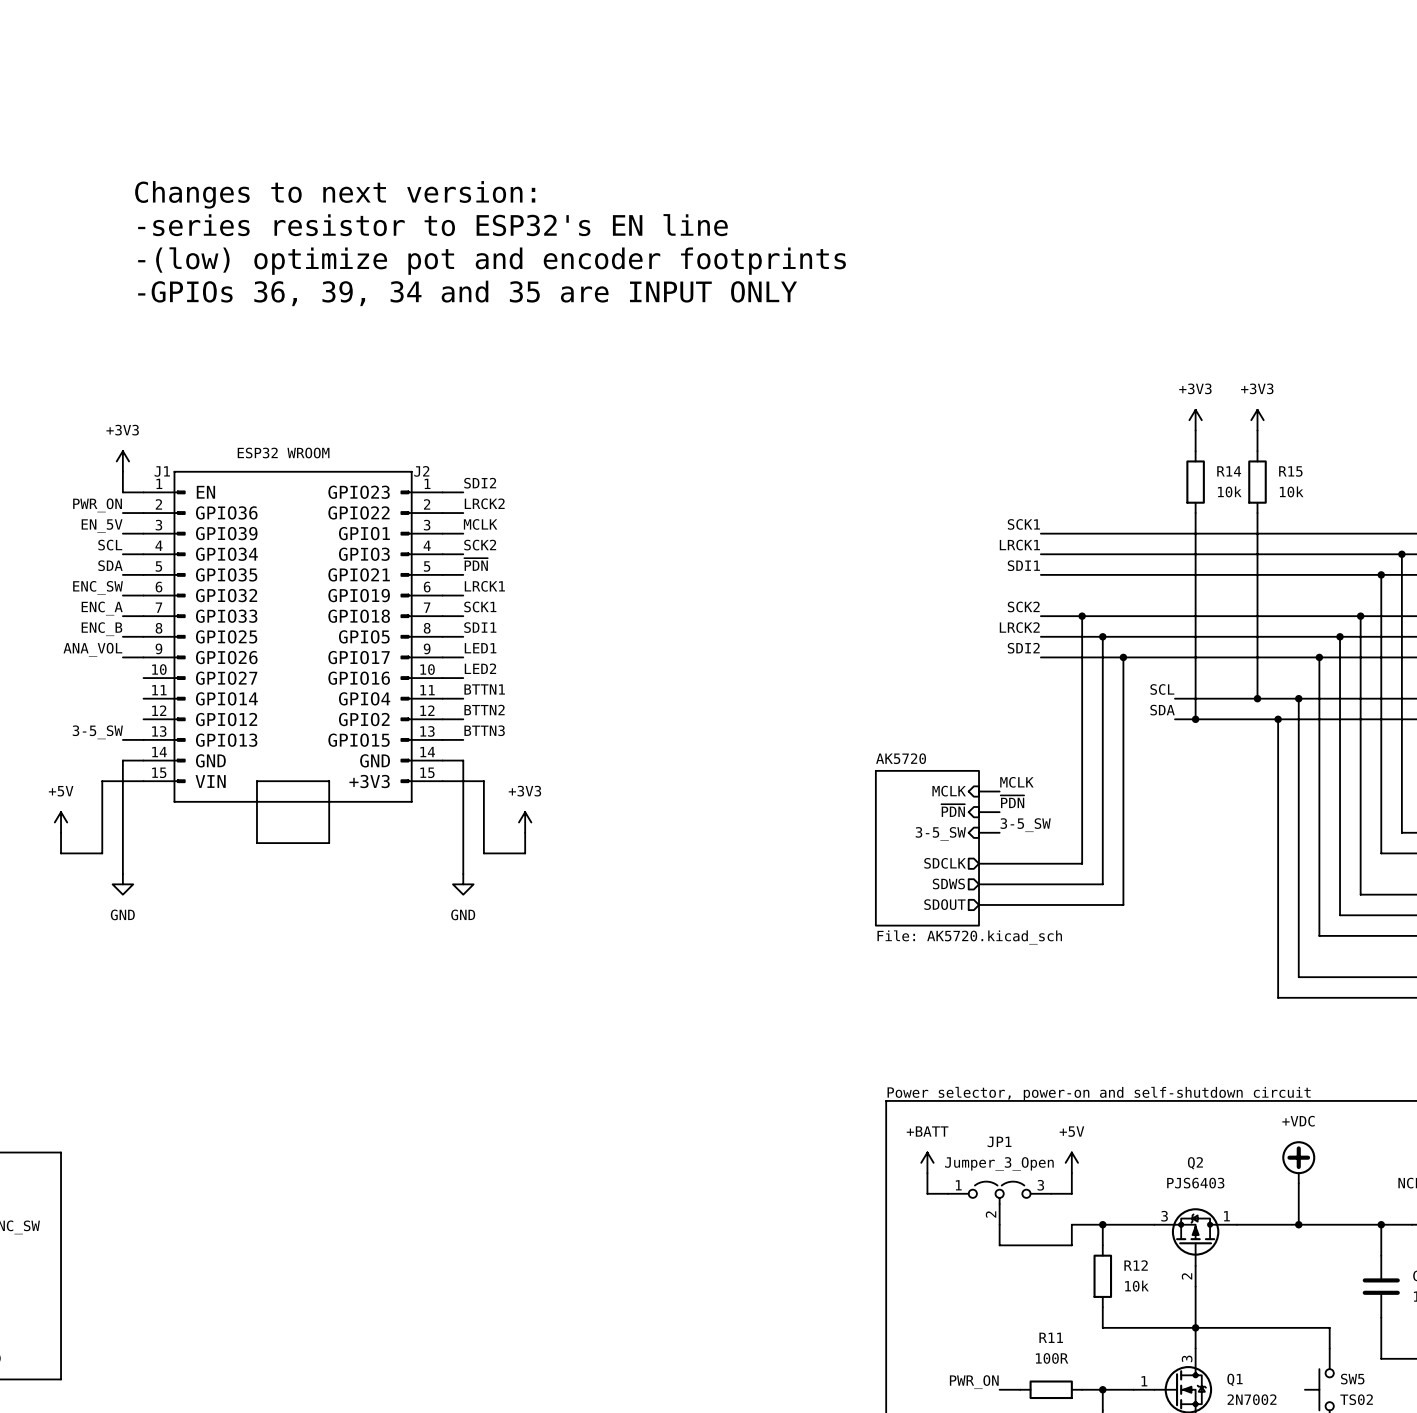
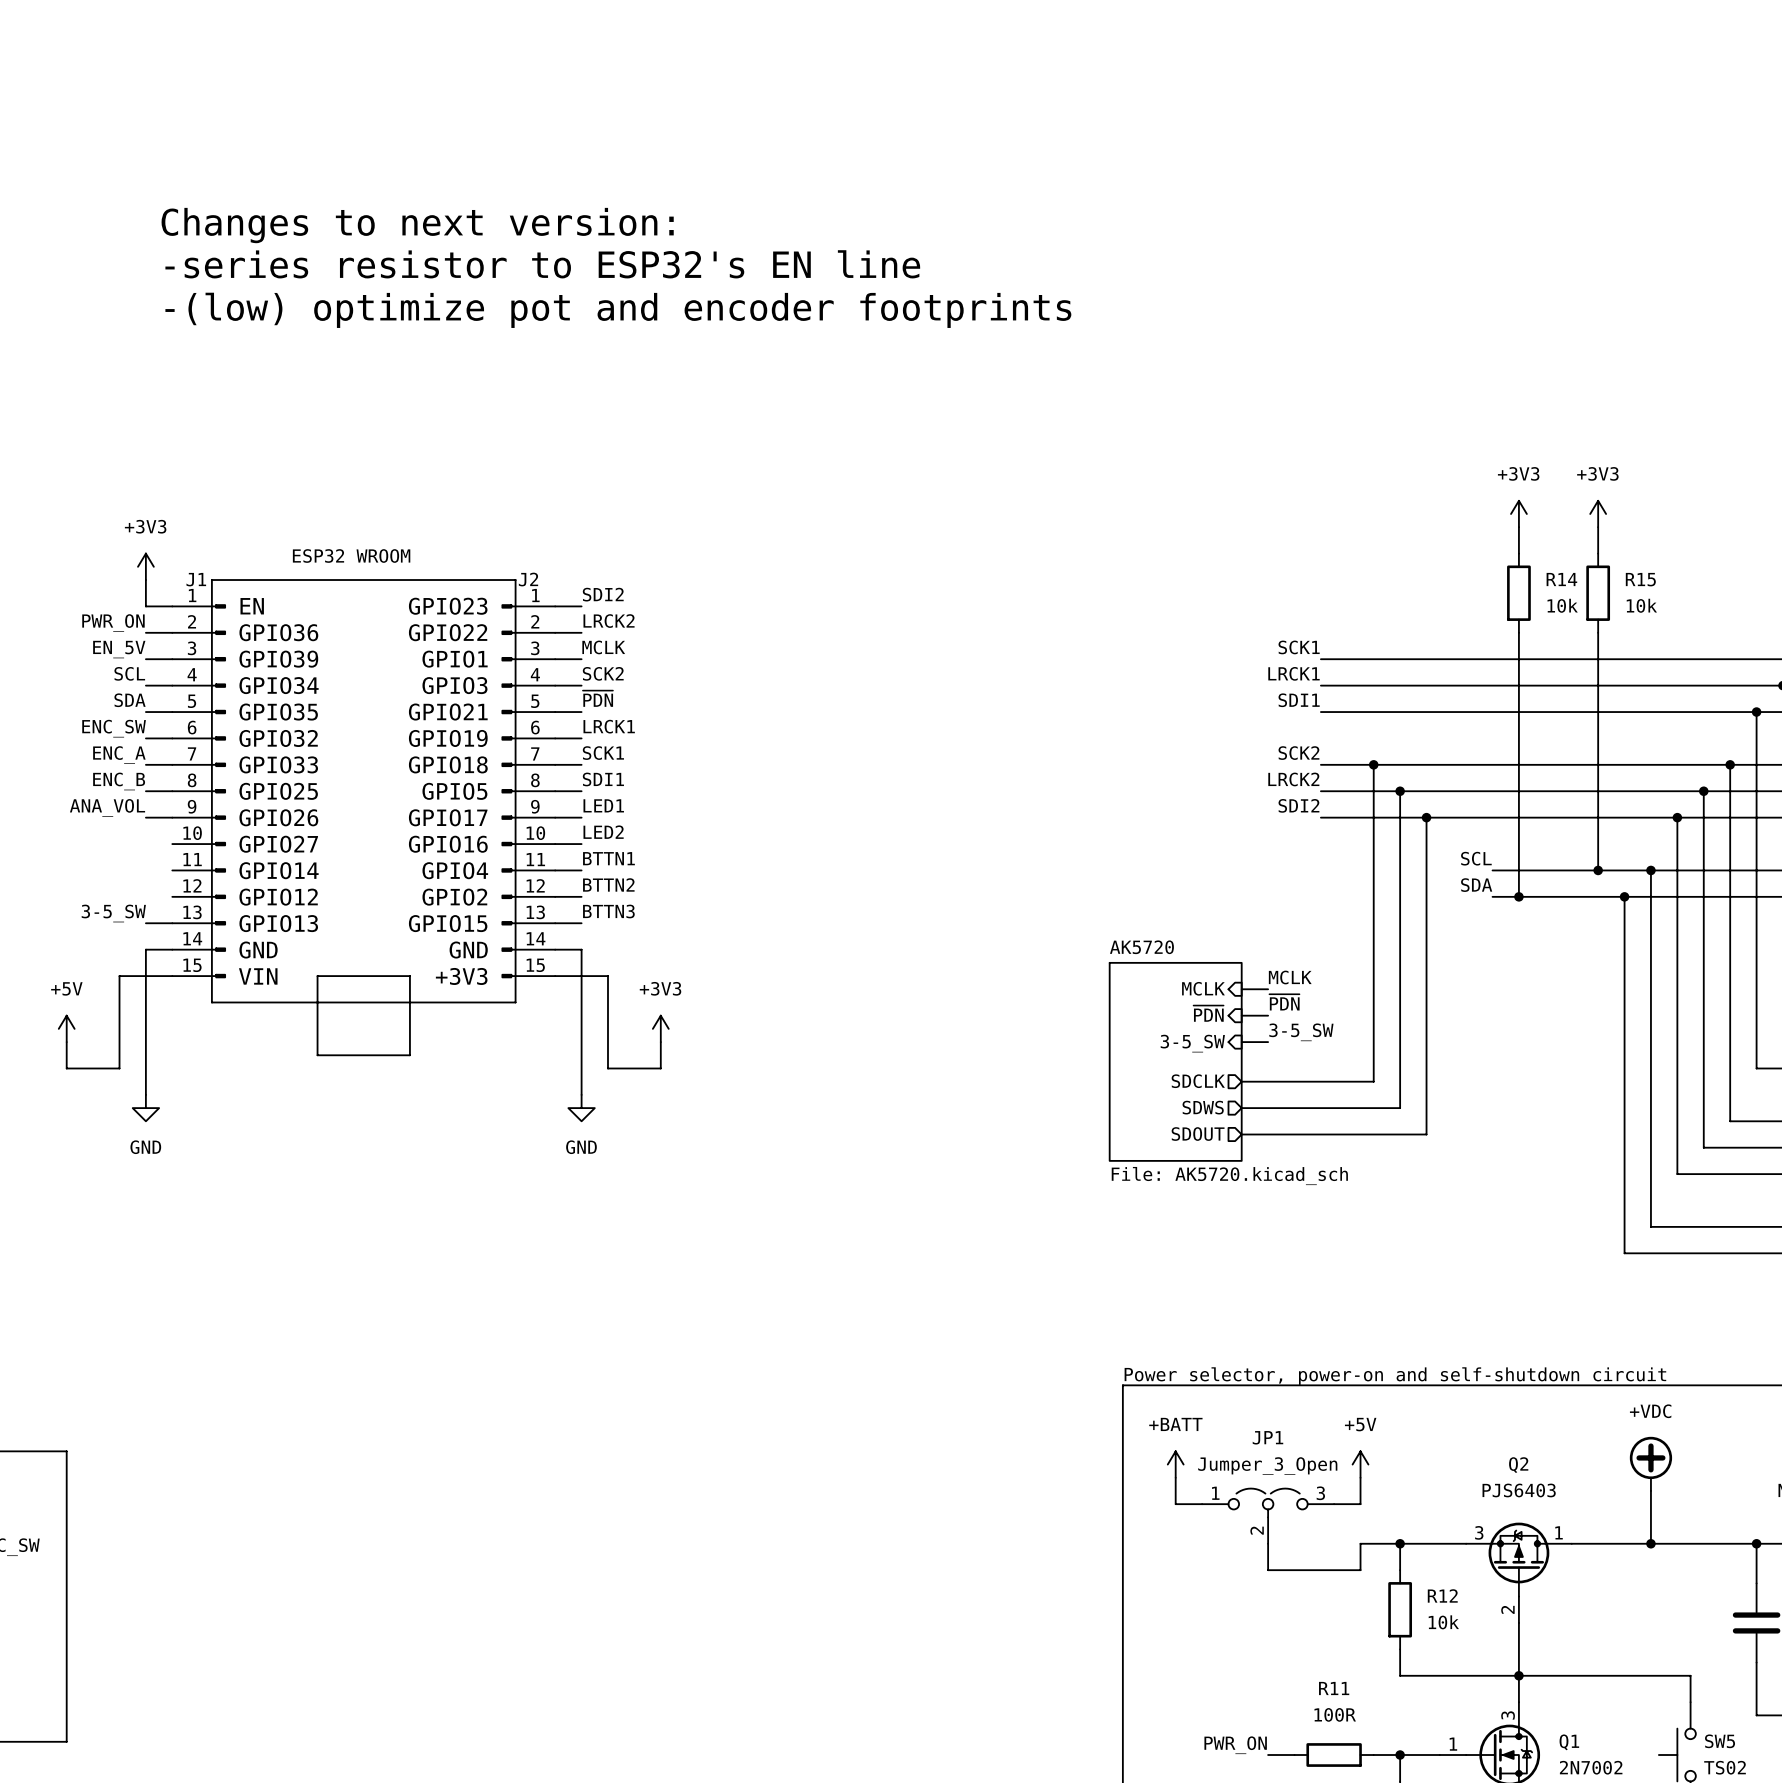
text: -GPIOs 36, 39, 34 and 35 are INPUT ONLY (467, 293) -> none

